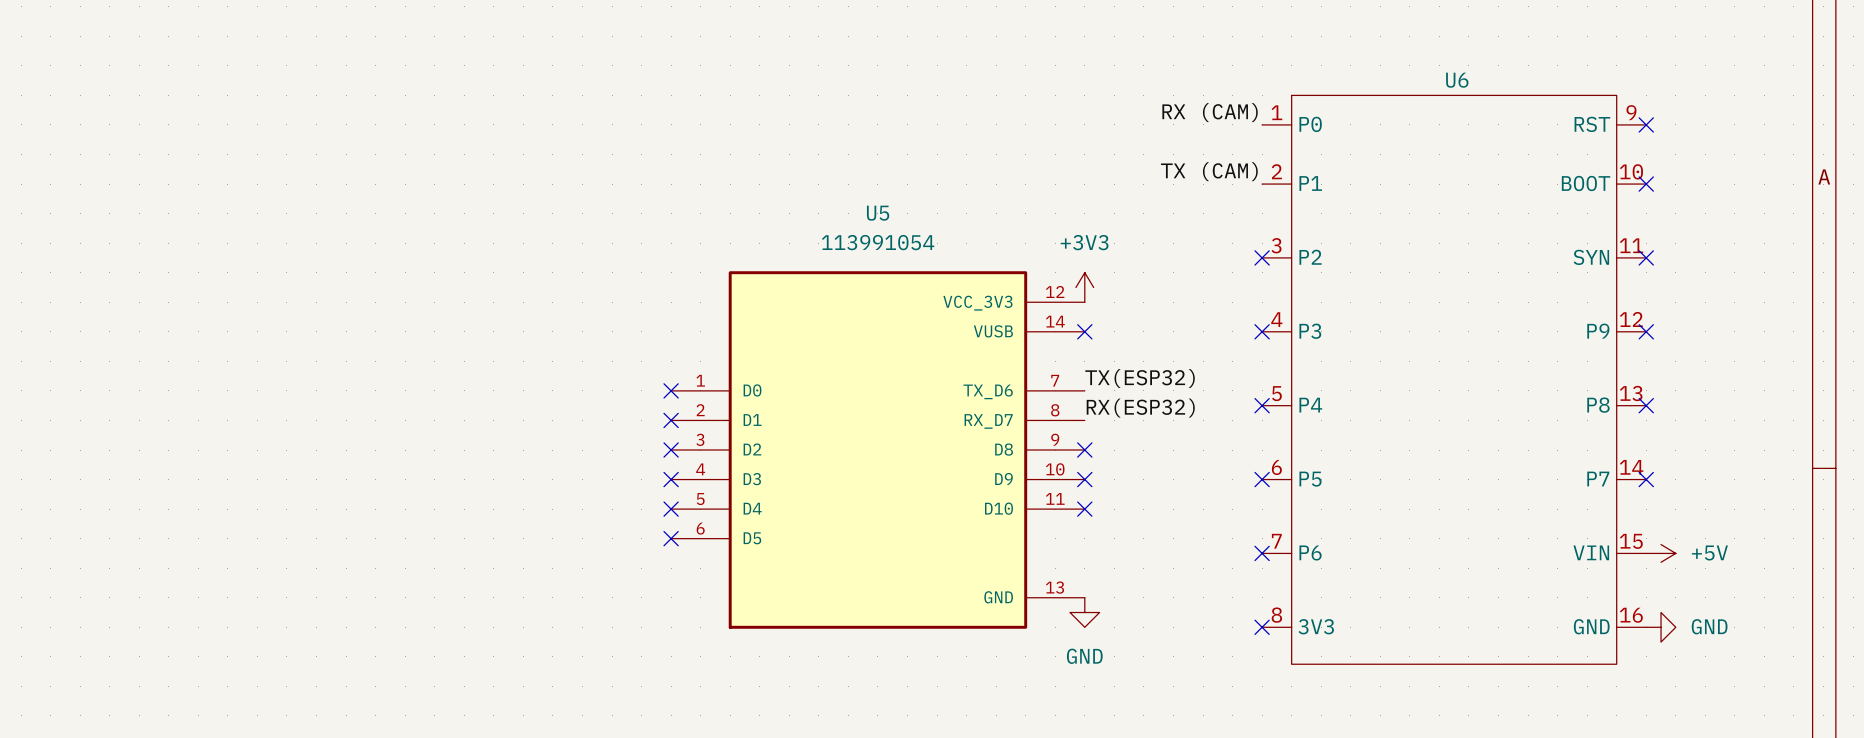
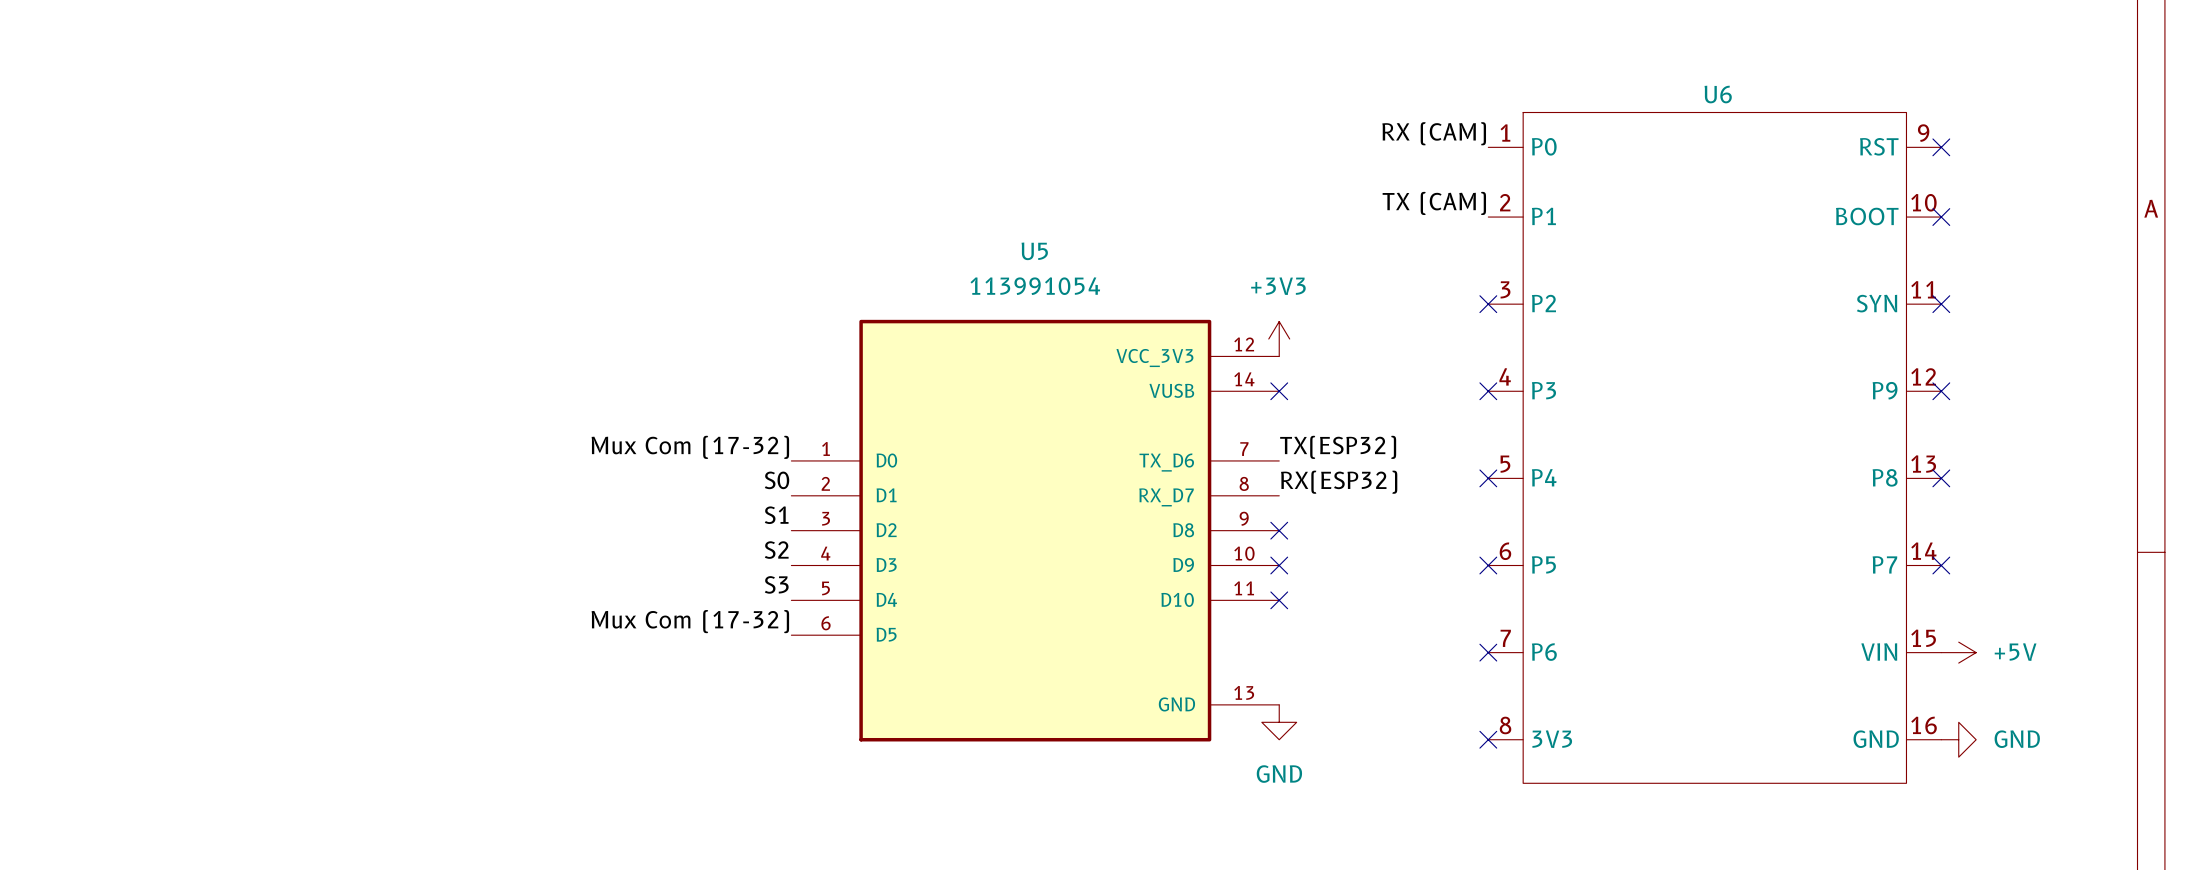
label: none -> Mux Com (17-32) (690, 447)
no-connect mark: (671, 390) -> none
label: none -> S0 (777, 480)
no-connect mark: (671, 420) -> none
label: none -> S1 (776, 515)
no-connect mark: (671, 450) -> none
label: none -> S2 (776, 550)
no-connect mark: (671, 479) -> none
label: none -> S3 (776, 584)
no-connect mark: (671, 509) -> none
label: none -> Mux Com (17-32) (690, 621)
no-connect mark: (671, 538) -> none

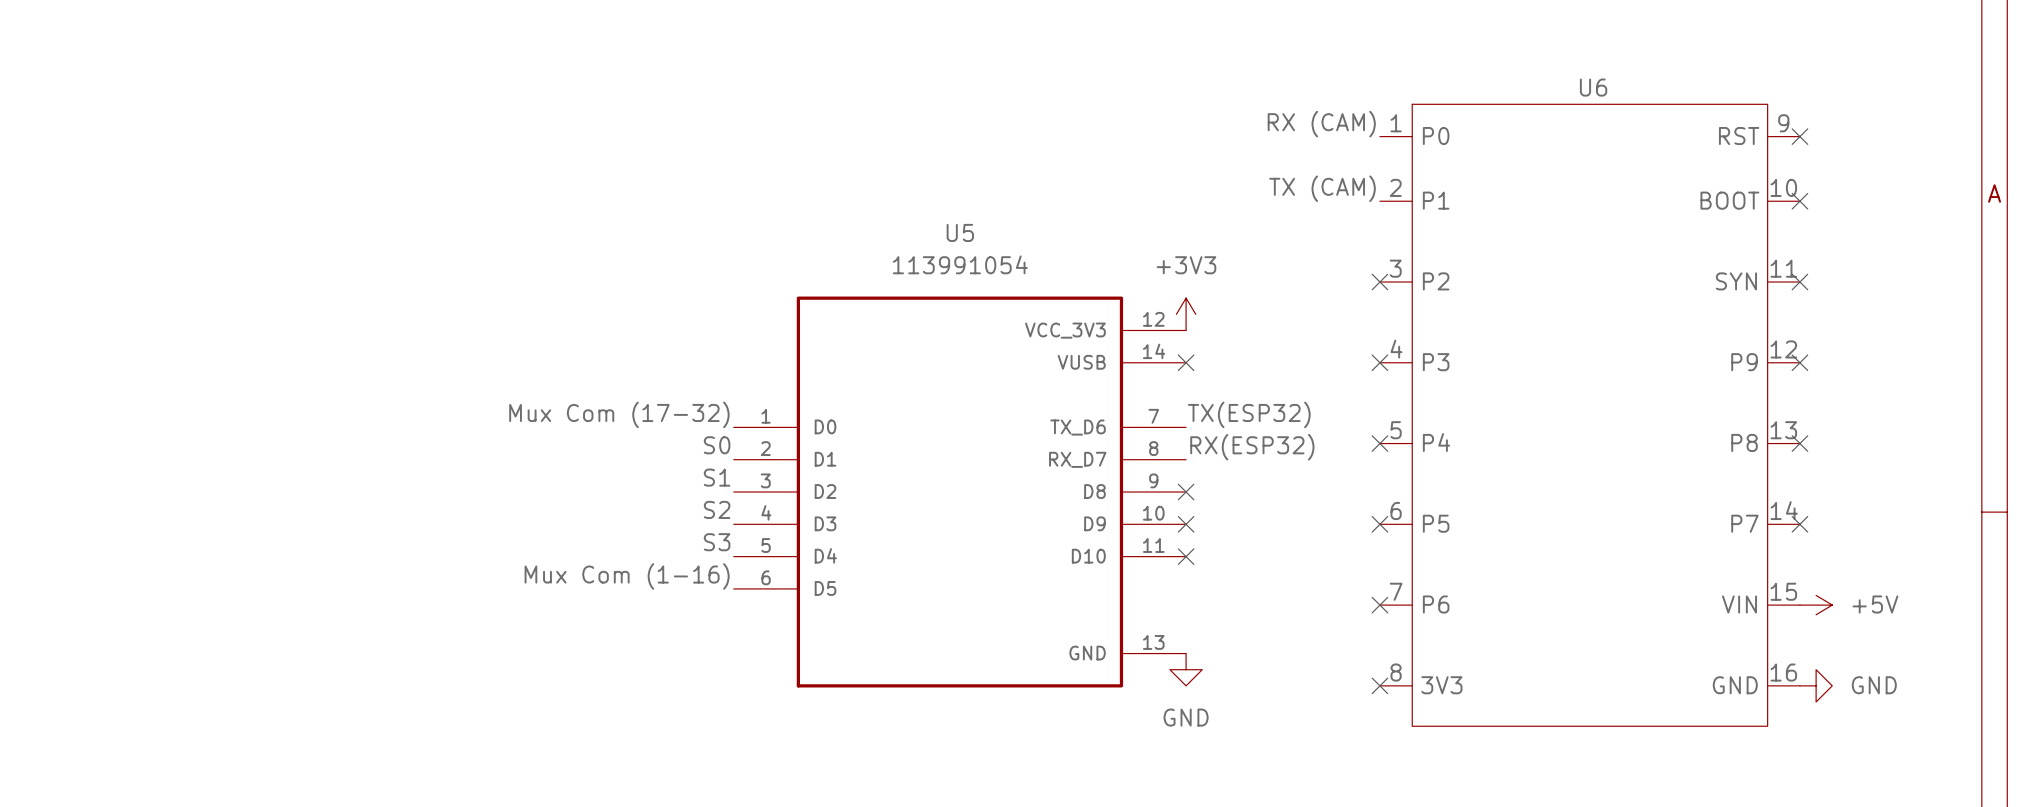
label: Mux Com (17-32) (690, 621) -> Mux Com (1-16) (627, 576)

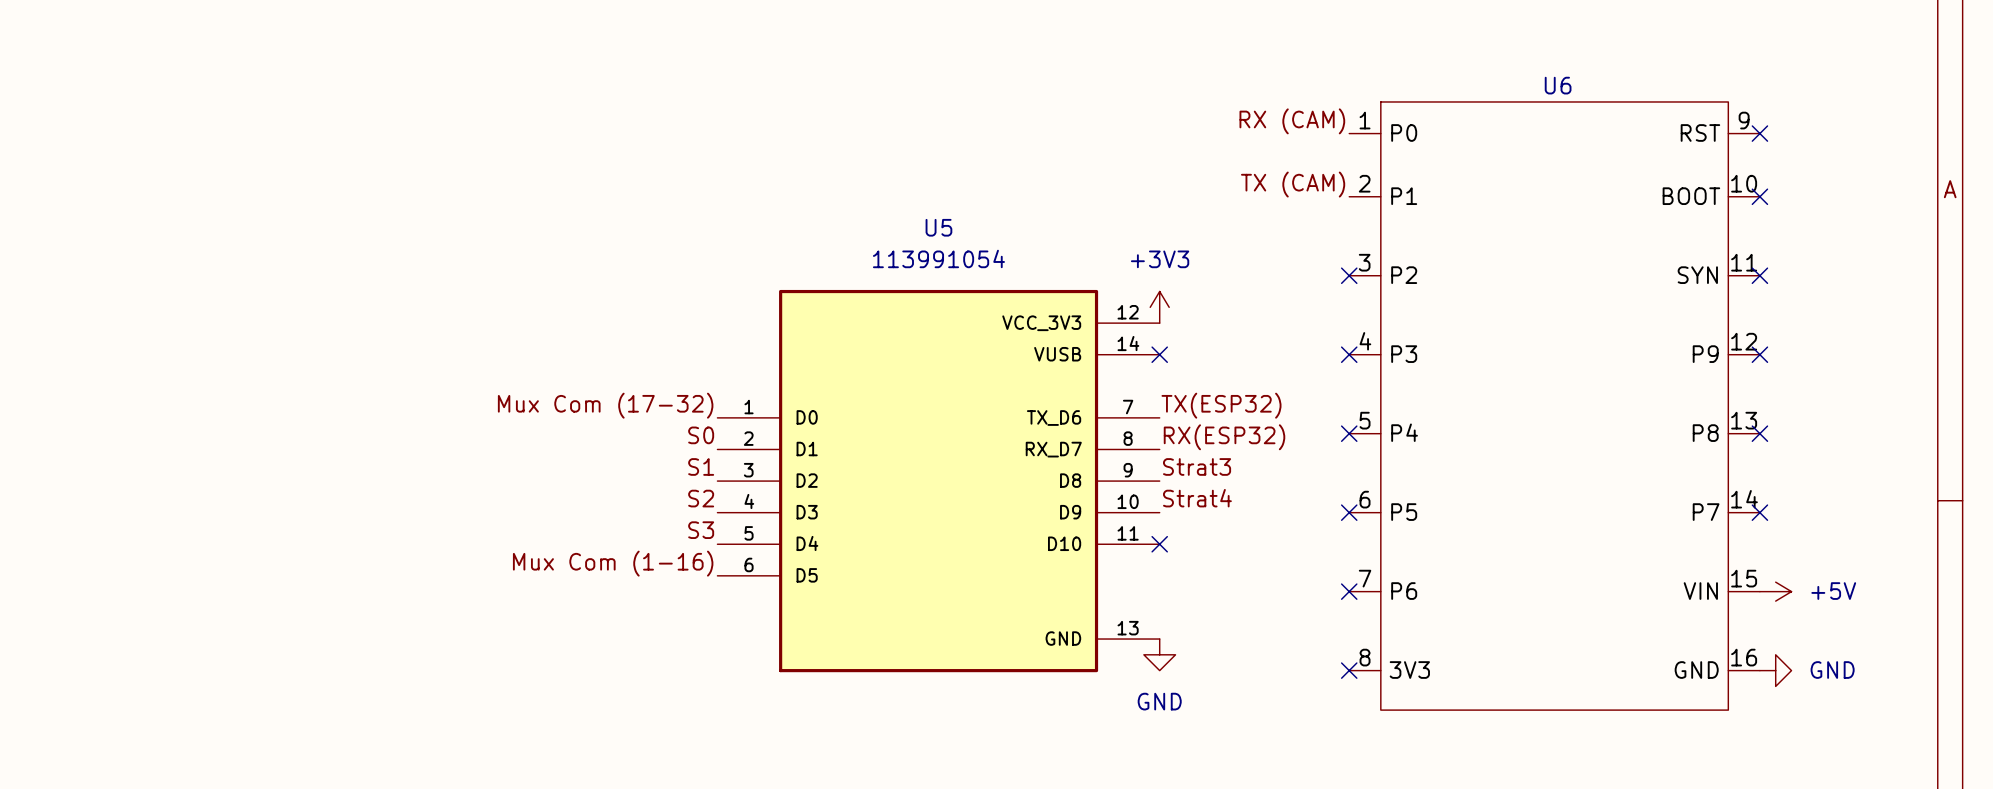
label: none -> Strat3 (1197, 466)
no-connect mark: (1186, 492) -> none
label: none -> Strat4 (1197, 498)
no-connect mark: (1186, 524) -> none

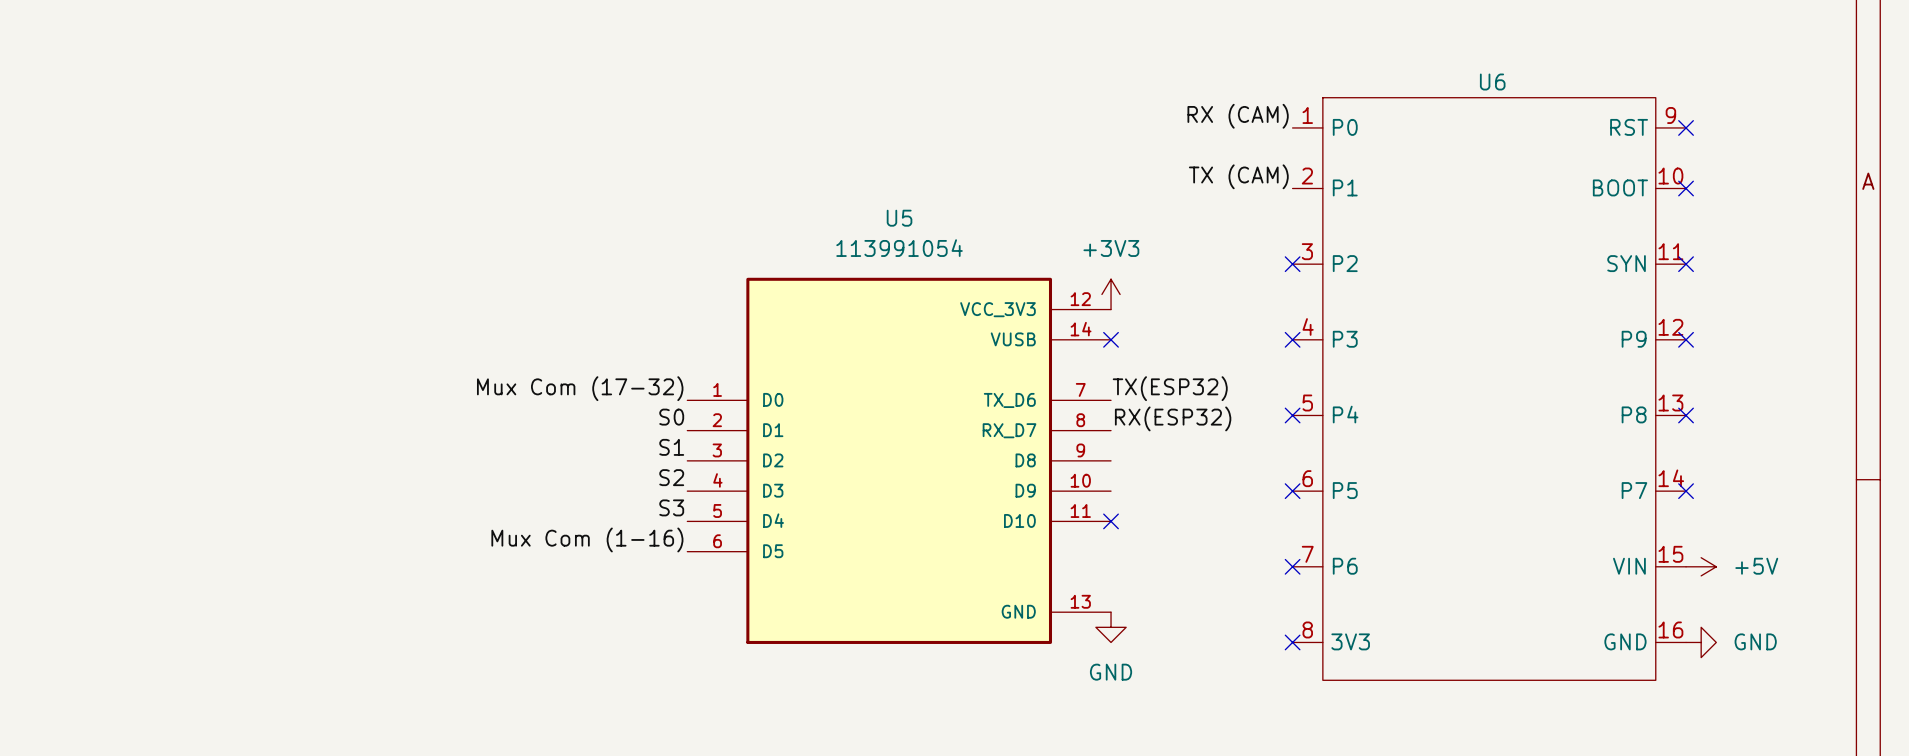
label: Strat3 (1197, 466) -> none
label: Strat4 (1197, 498) -> none

